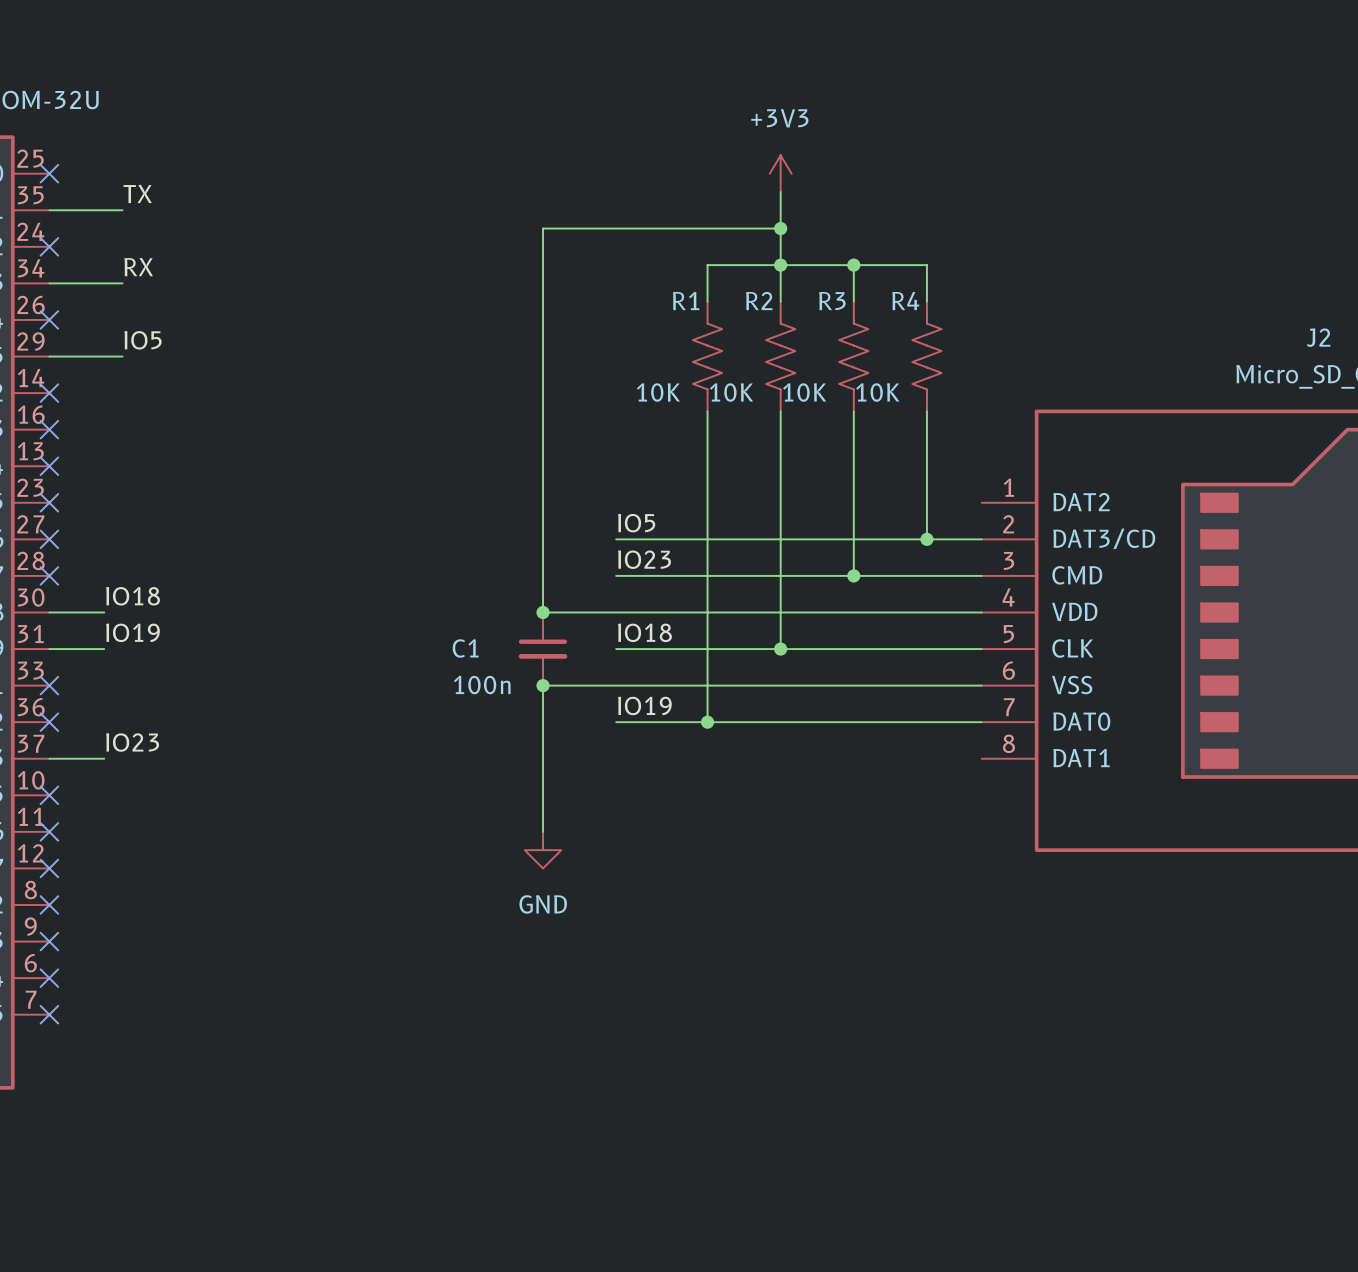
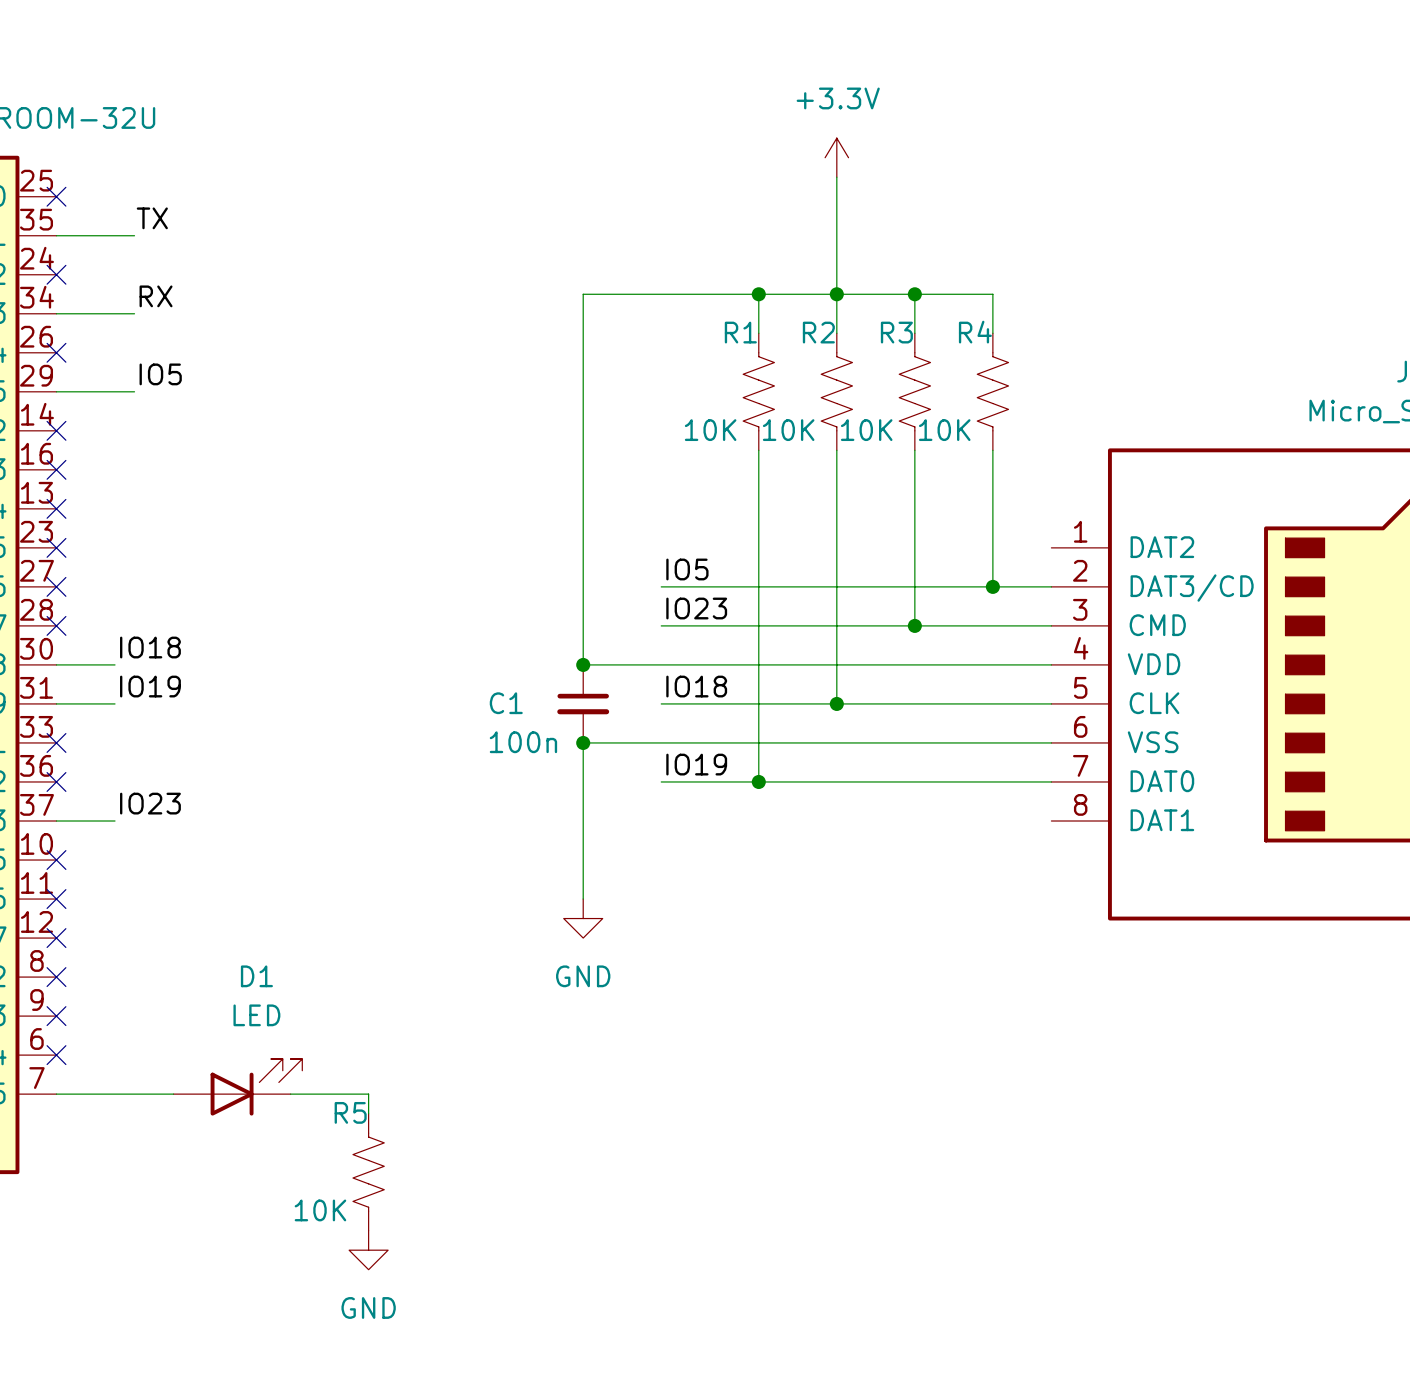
power symbol: none -> +3.3V (836, 157)
power symbol: +3V3 (780, 173) -> none
wire: (780, 228) (543, 228) (543, 265) -> (758, 294) (583, 294)
junction position: (780, 228) -> (758, 294)
D1: none -> LED (237, 1087)
wire: none -> (56, 1094) (173, 1094)
no-connect mark: (49, 1014) -> none
wire: none -> (290, 1094) (368, 1094) (368, 1113)
R5: none -> 10K (368, 1172)
power symbol: none -> GND (368, 1250)

